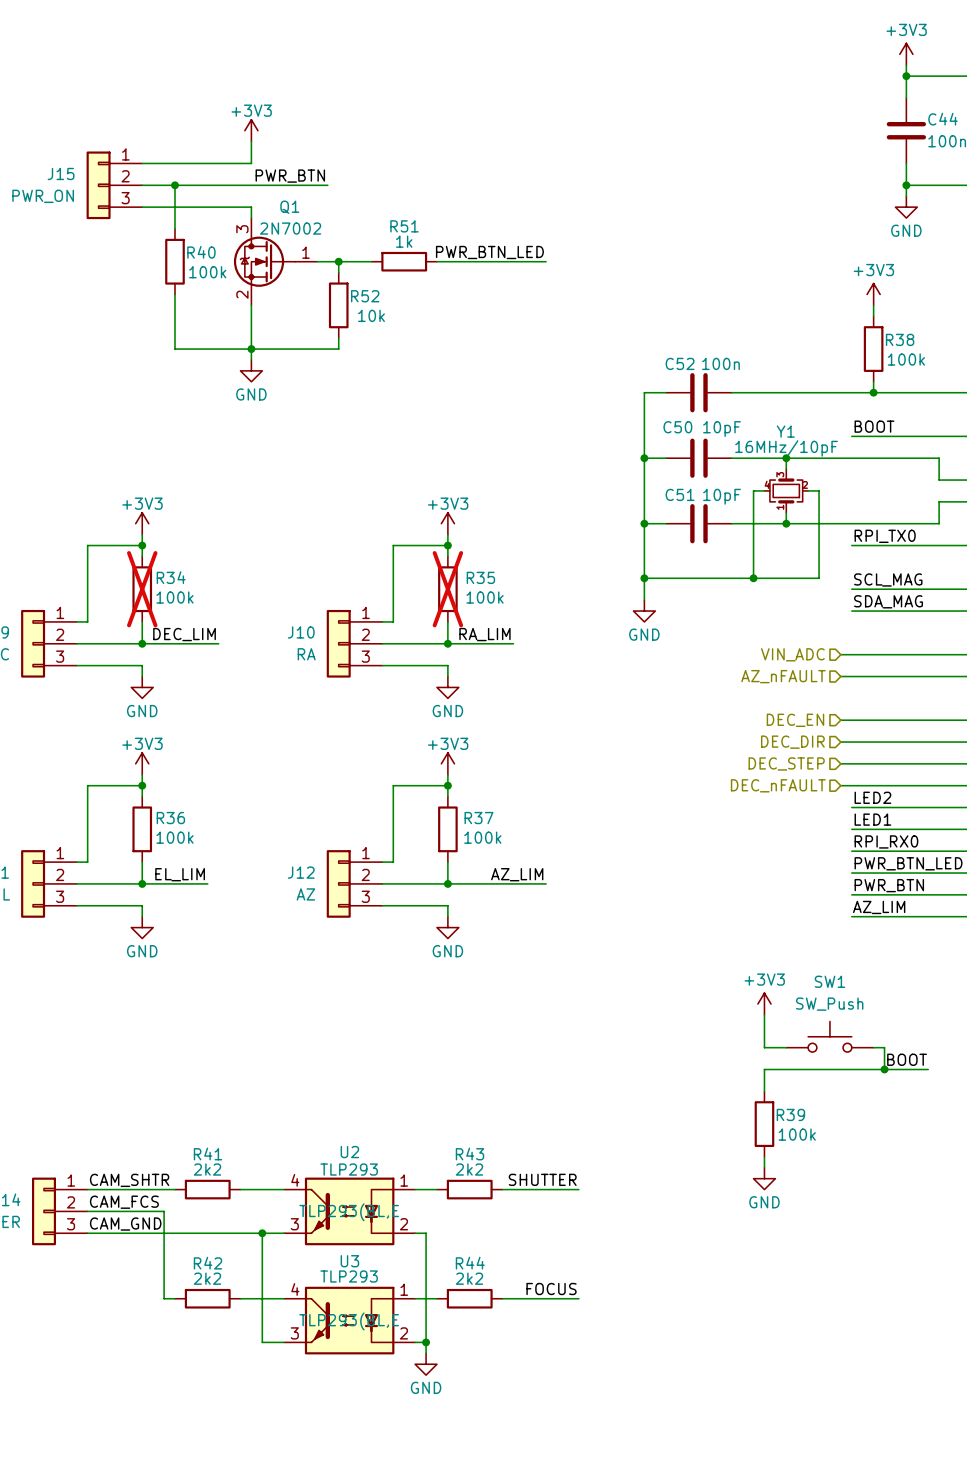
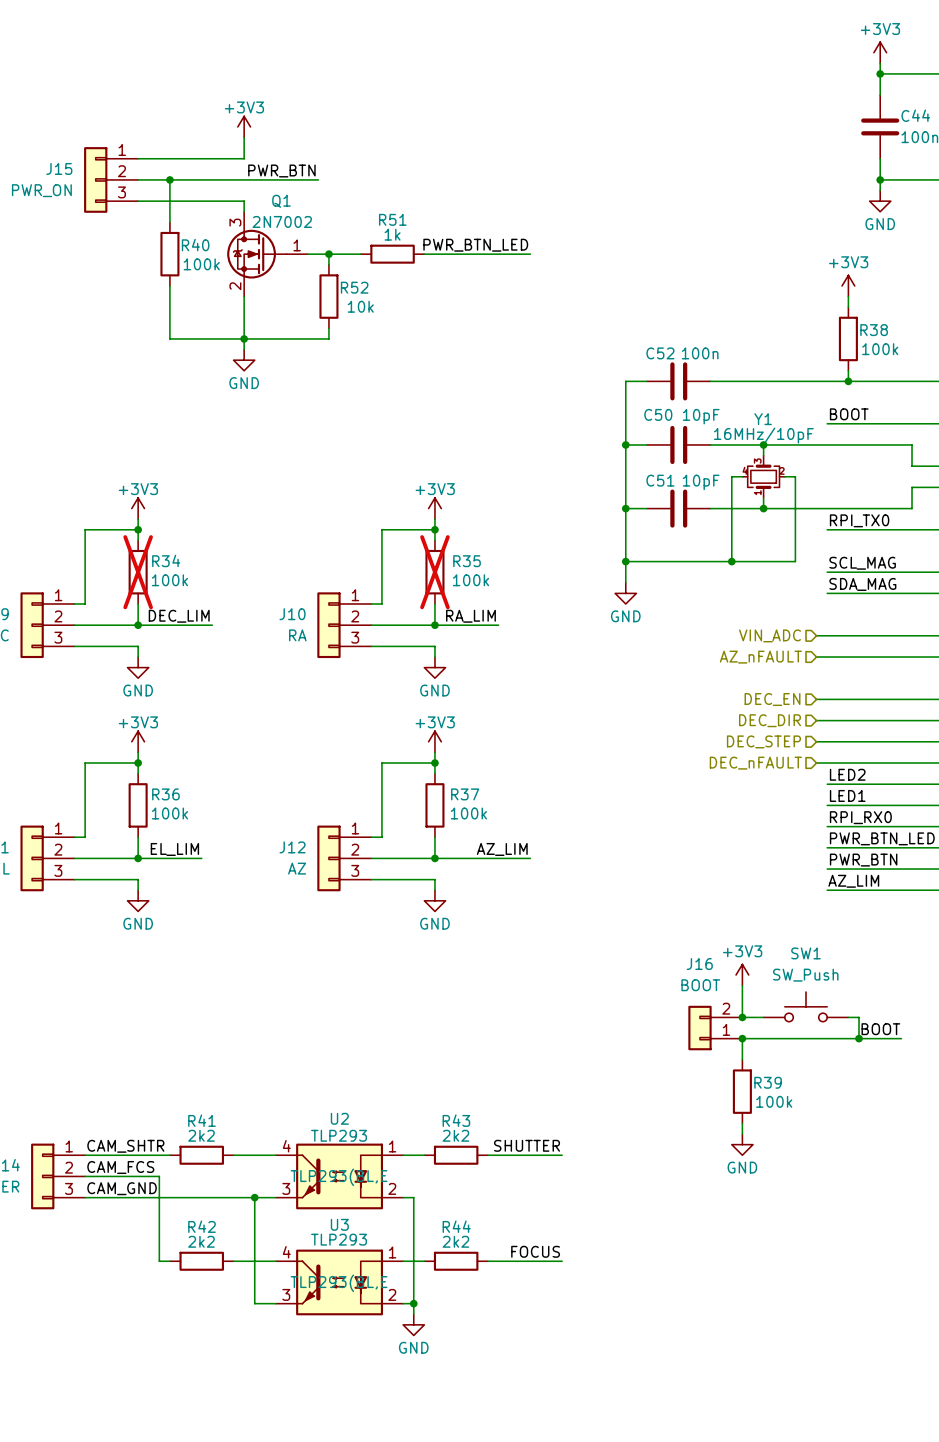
junction: none -> (742, 1017)
J16: none -> BOOT (715, 1028)
junction: none -> (742, 1038)

